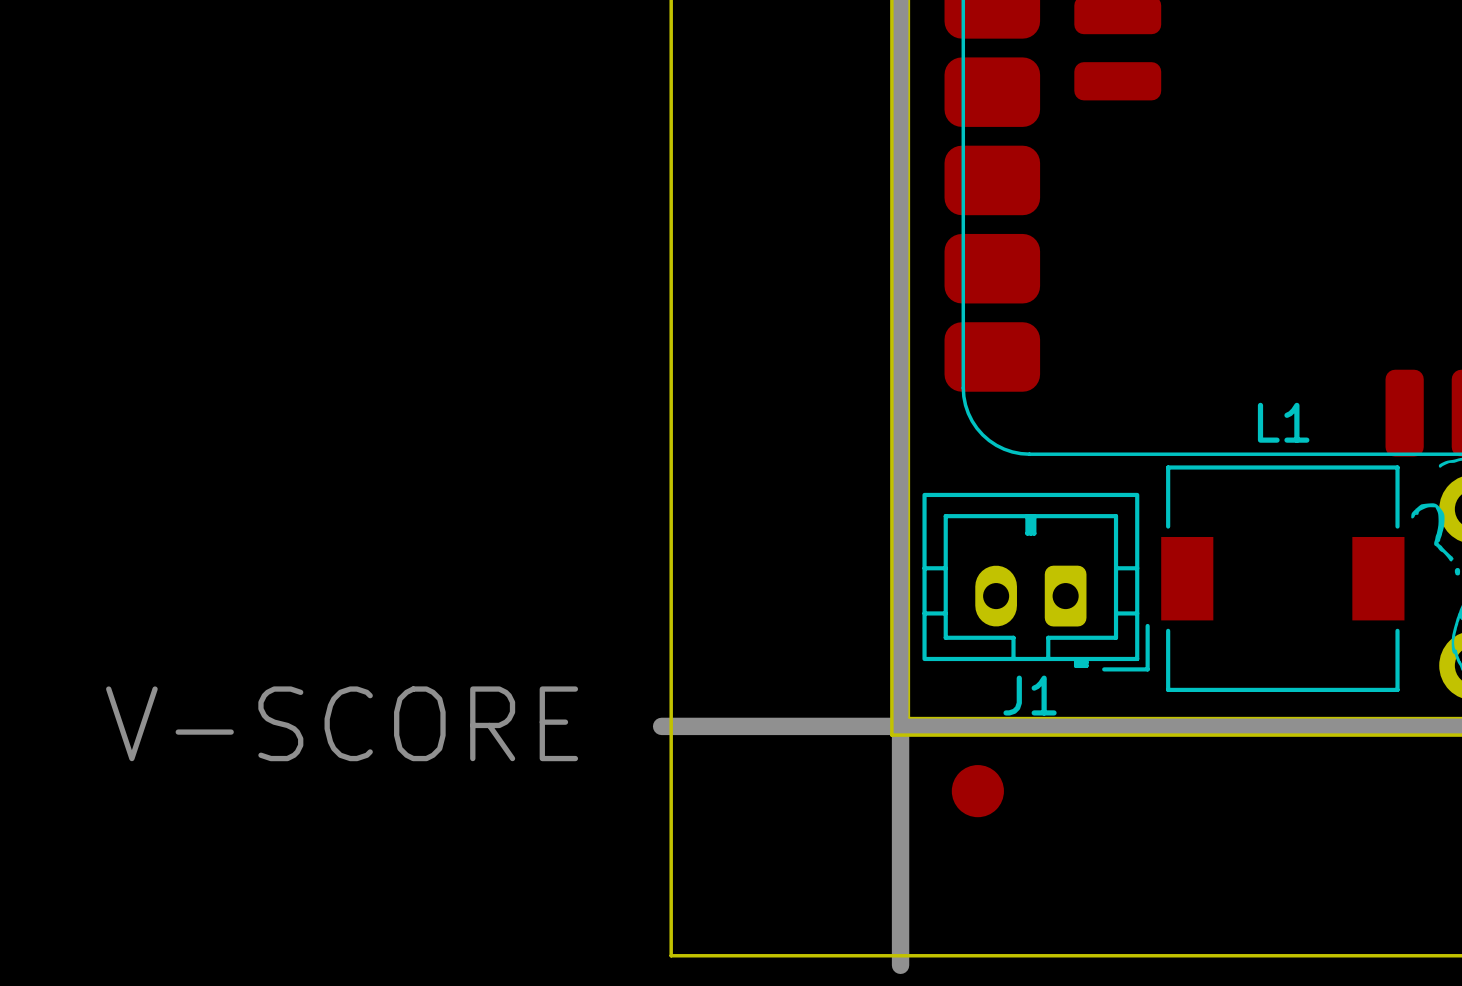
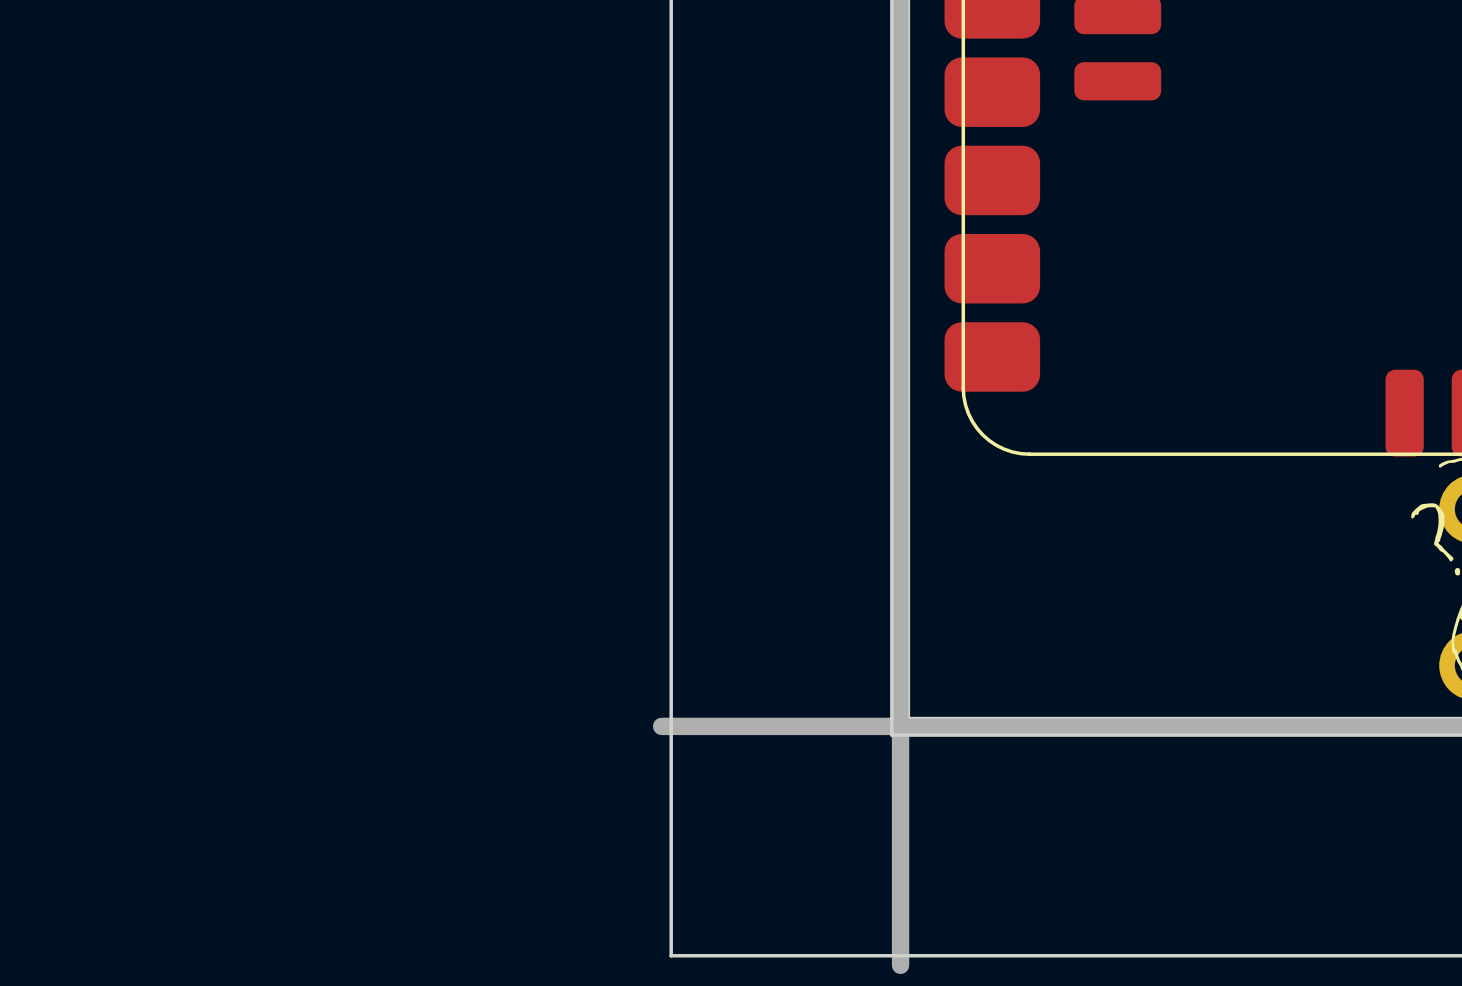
L1: (1282, 578) -> none
J1: (1036, 582) -> none
text: V-SCORE (342, 723) -> none
part: (977, 791) -> none

